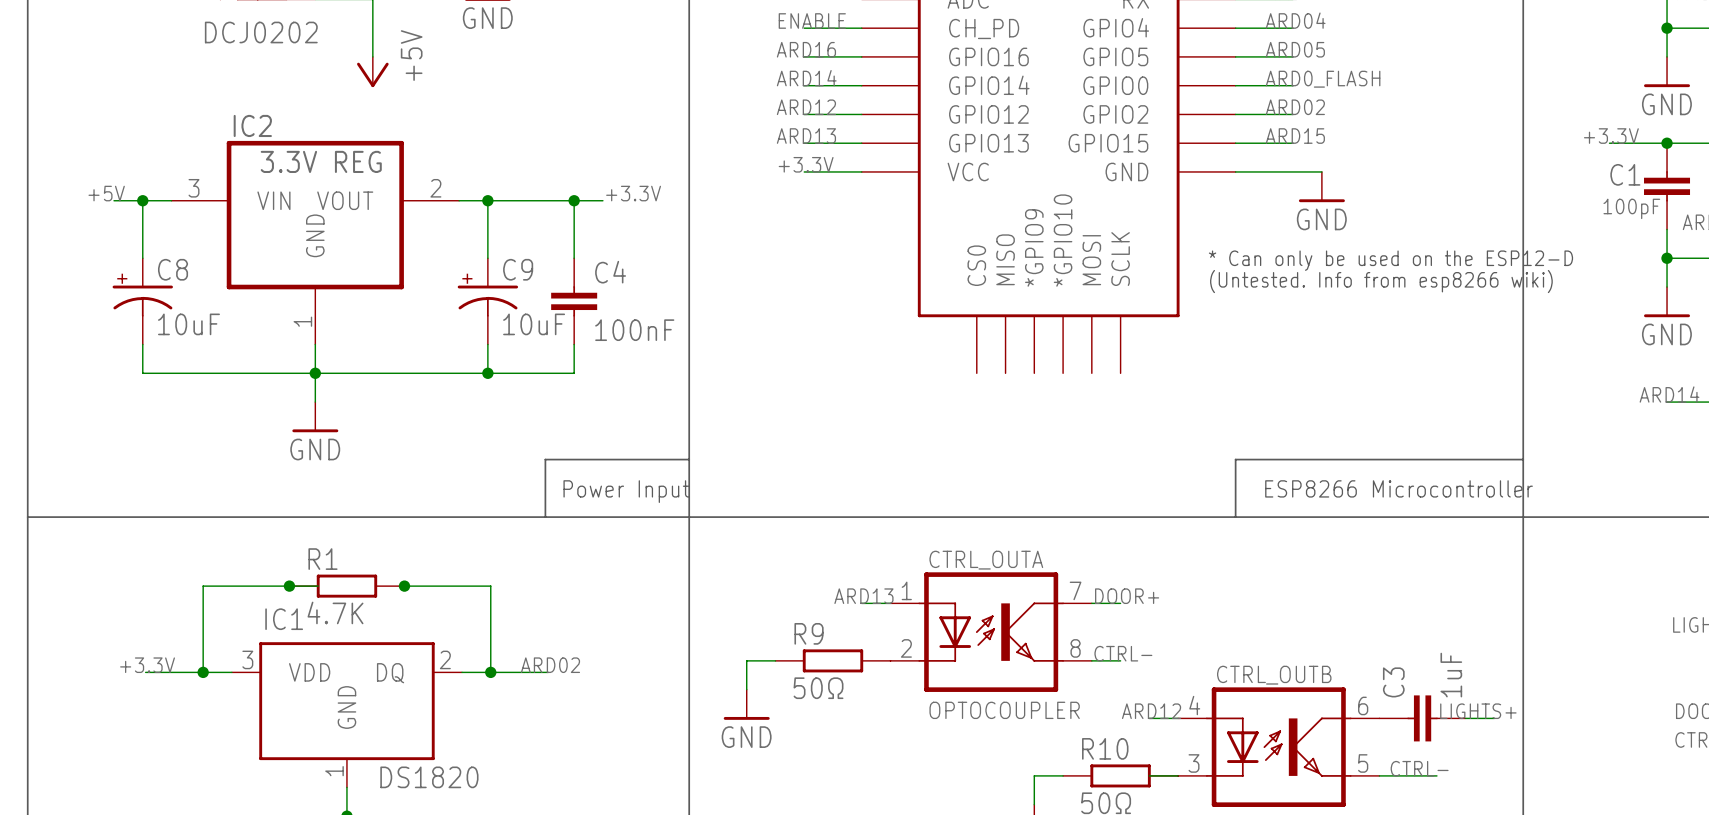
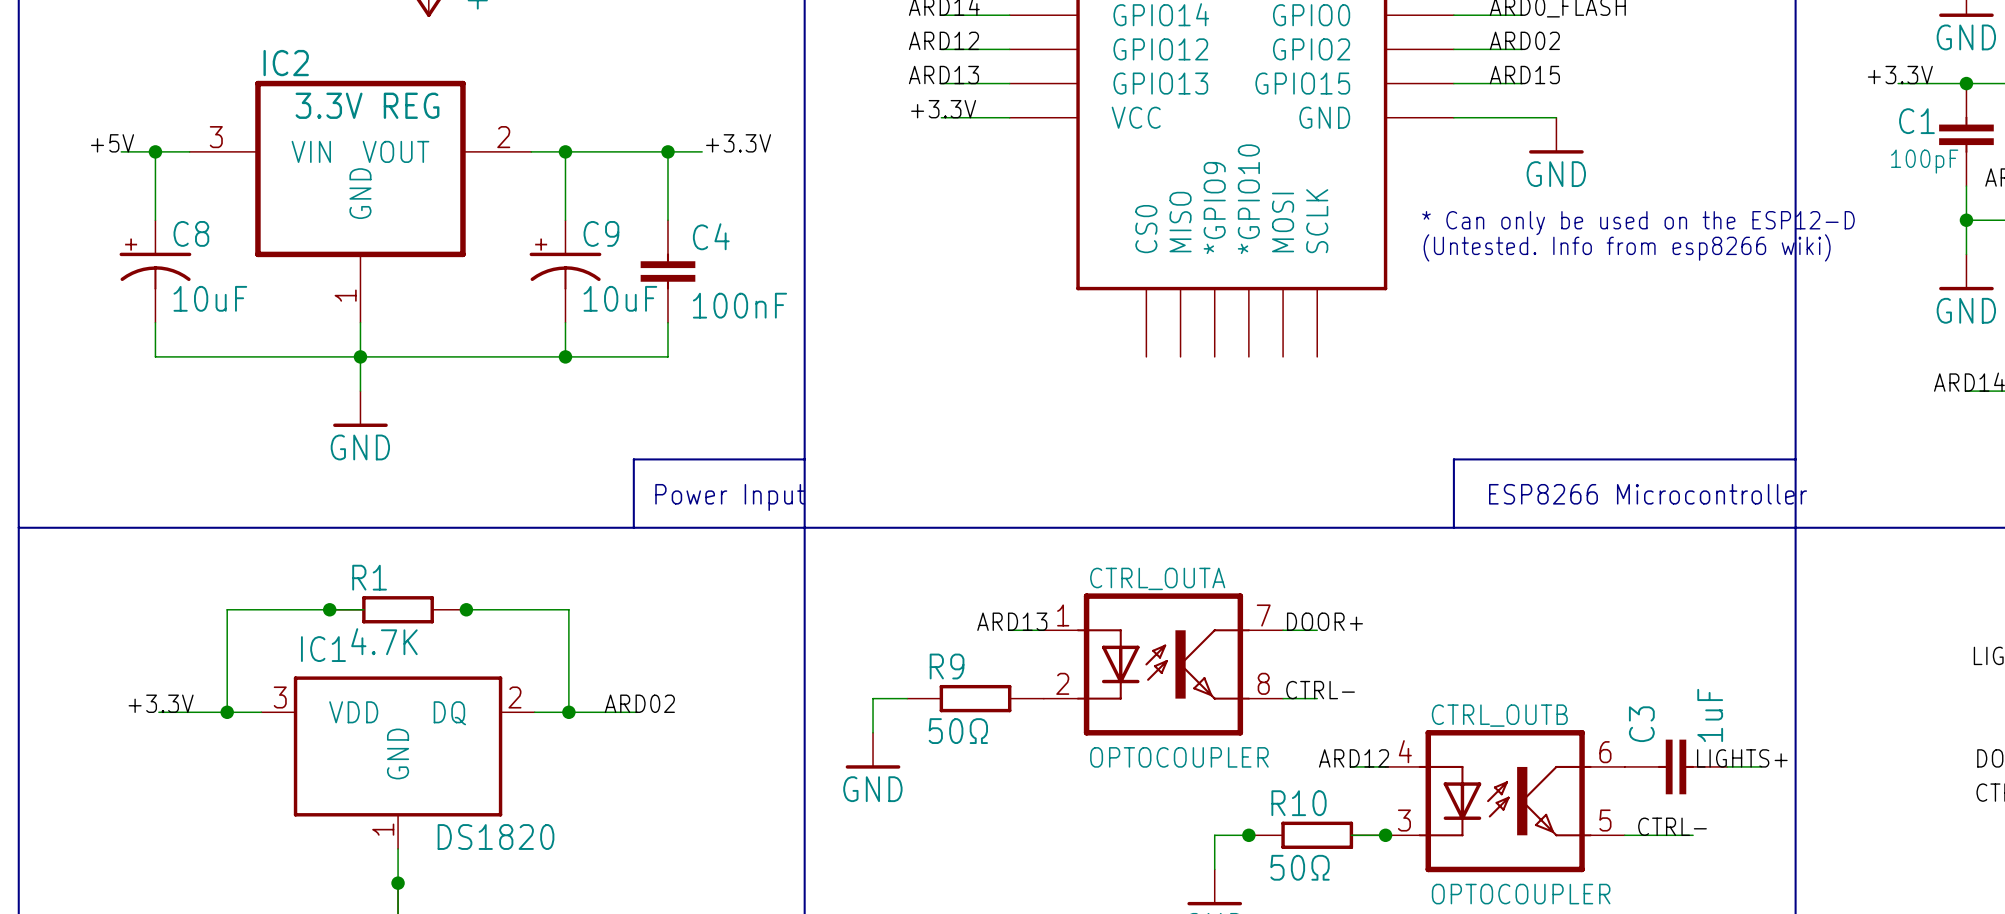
junction: none -> (1248, 835)
junction: none -> (1385, 835)

